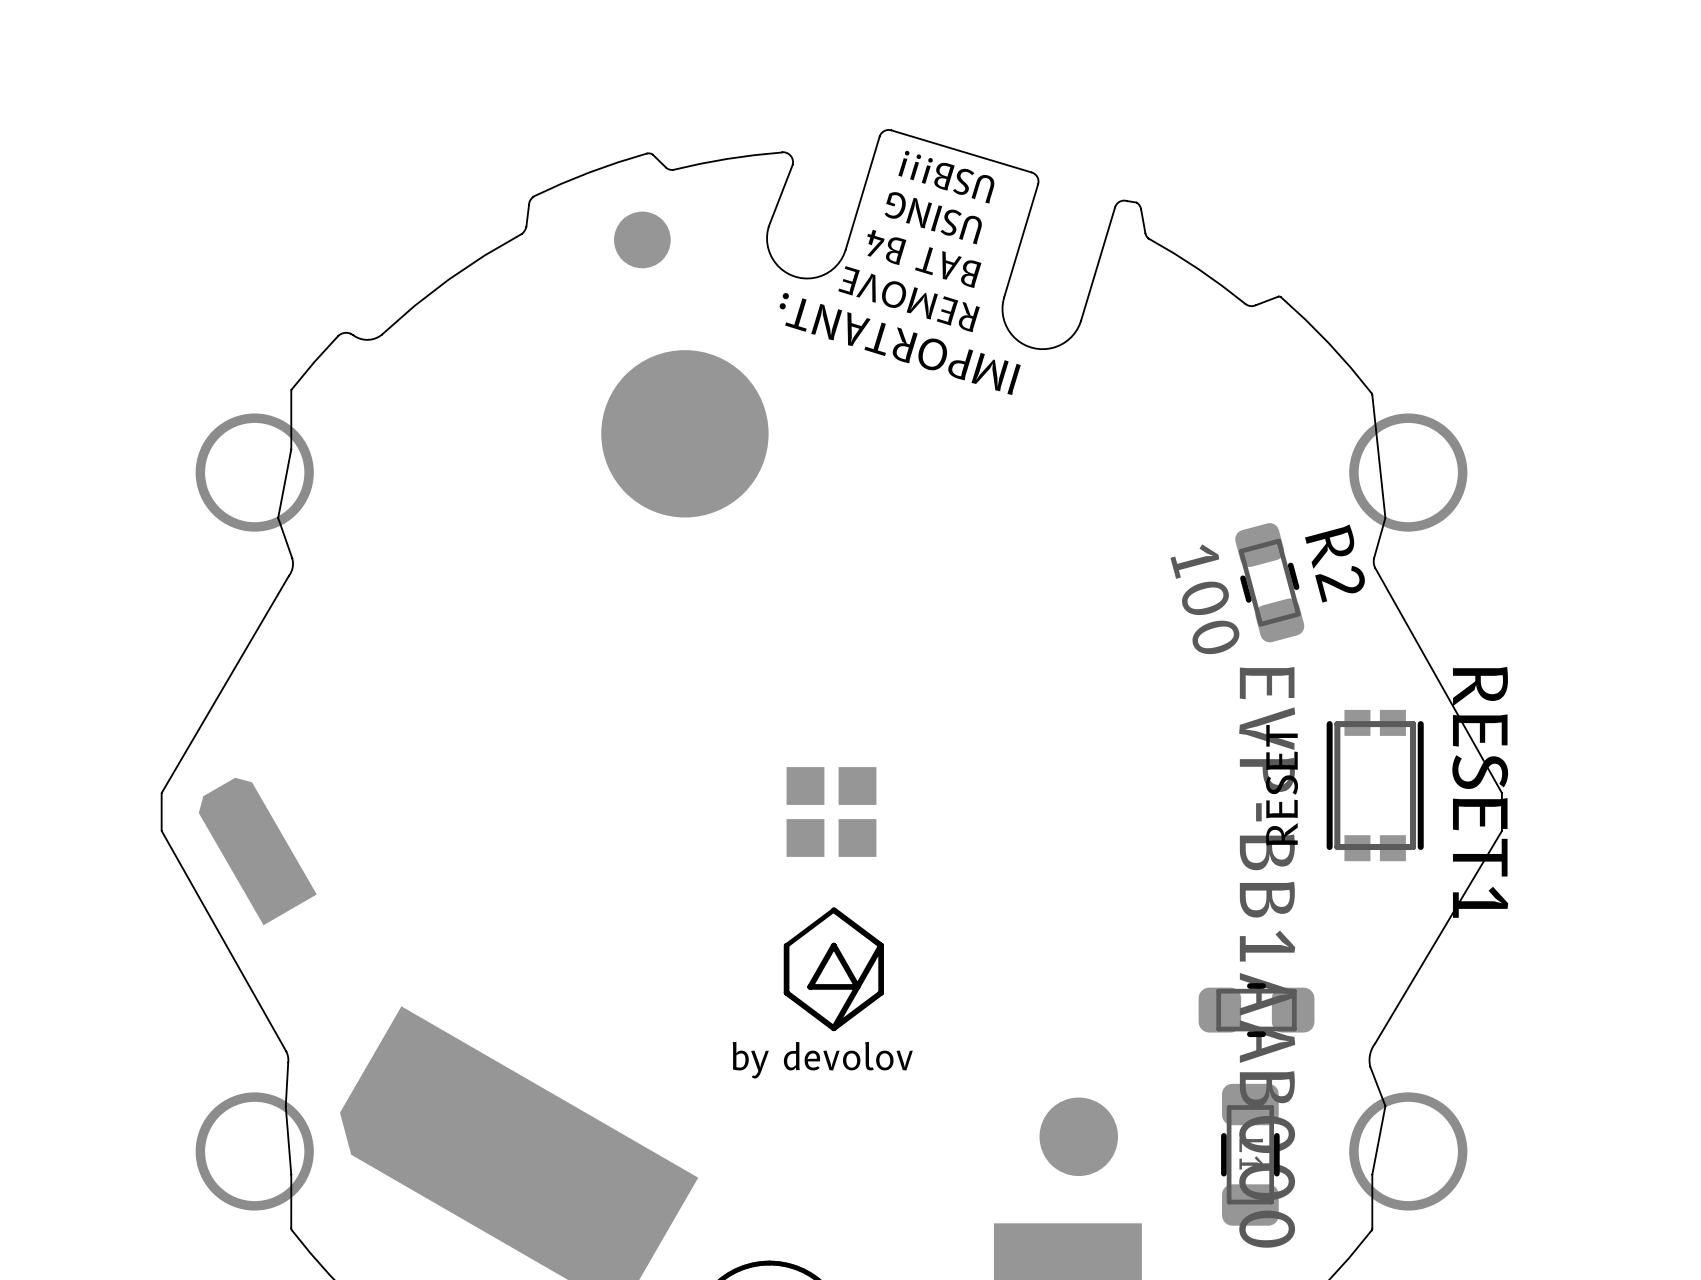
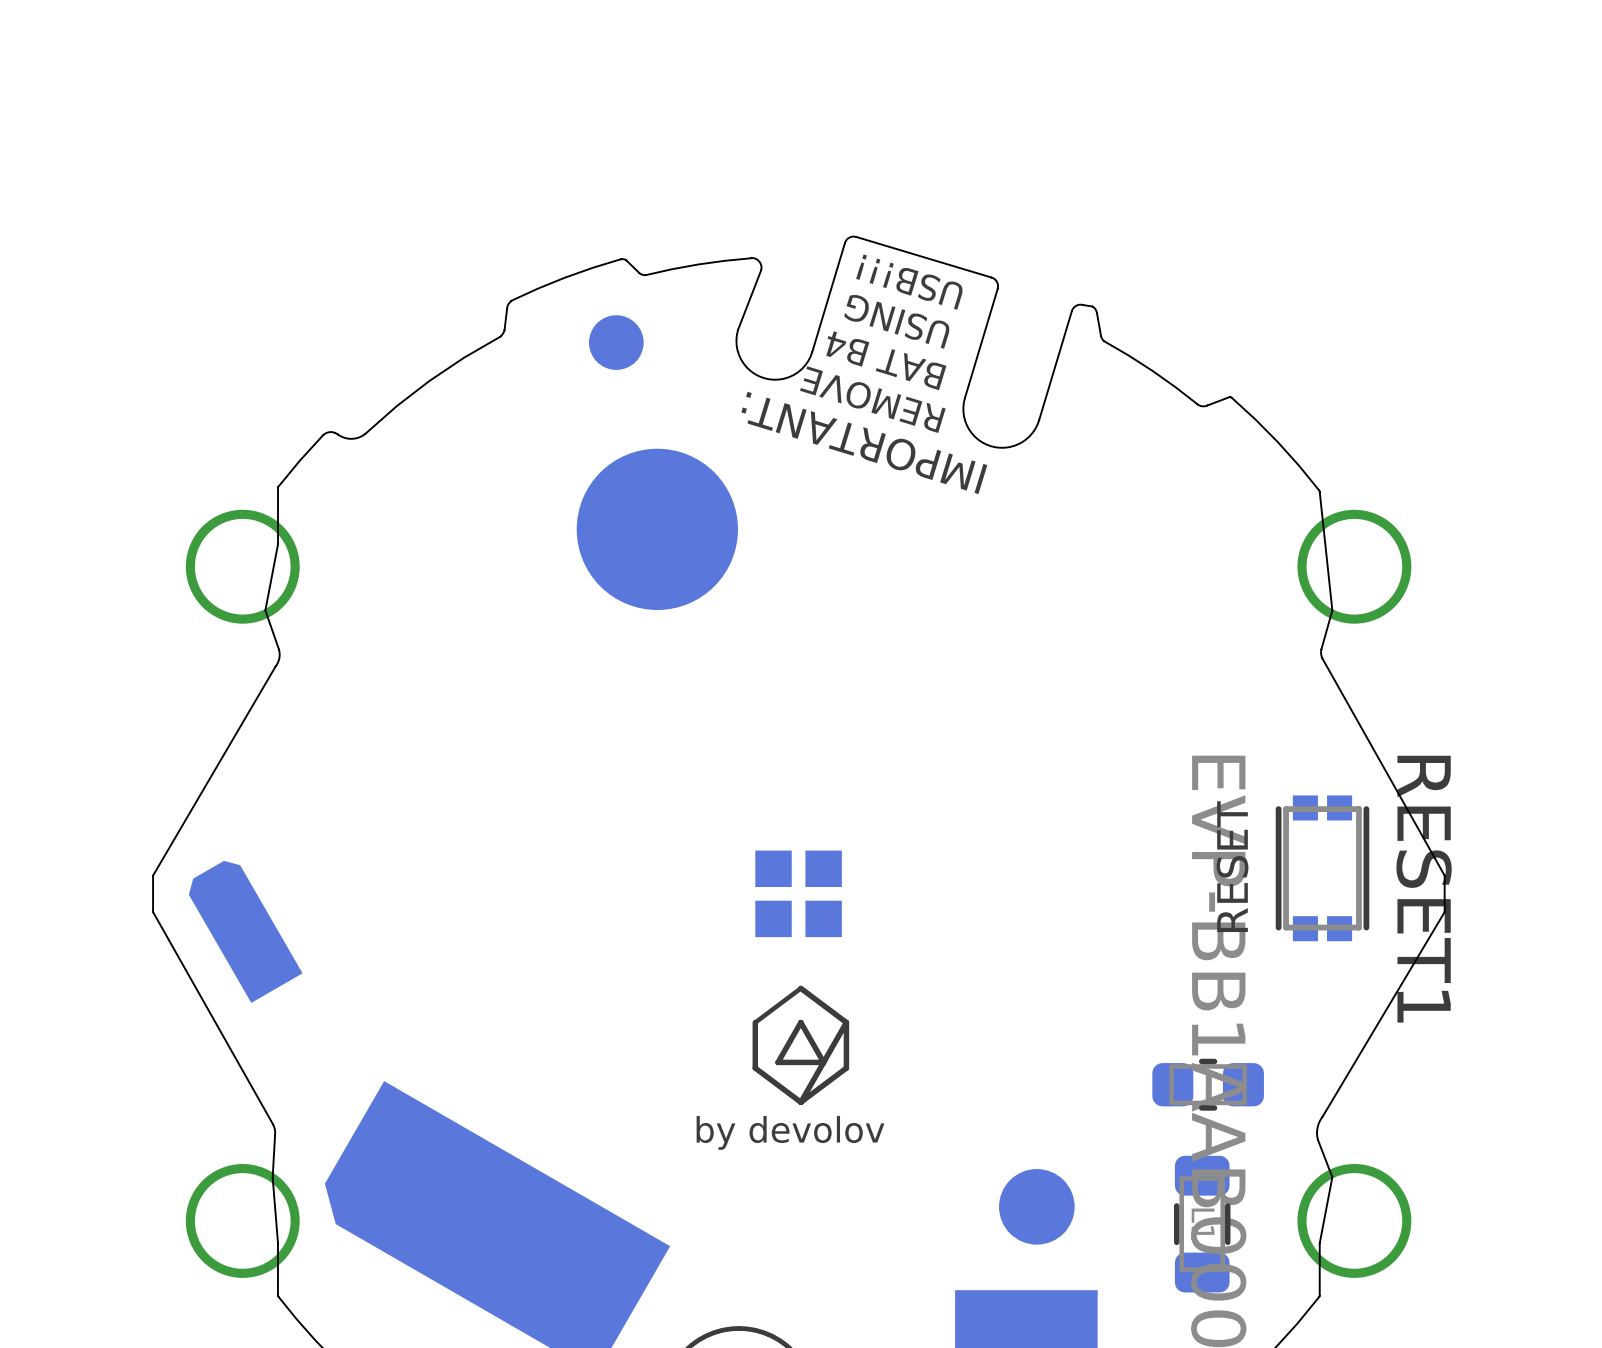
R2: 100 (1269, 582) -> none

